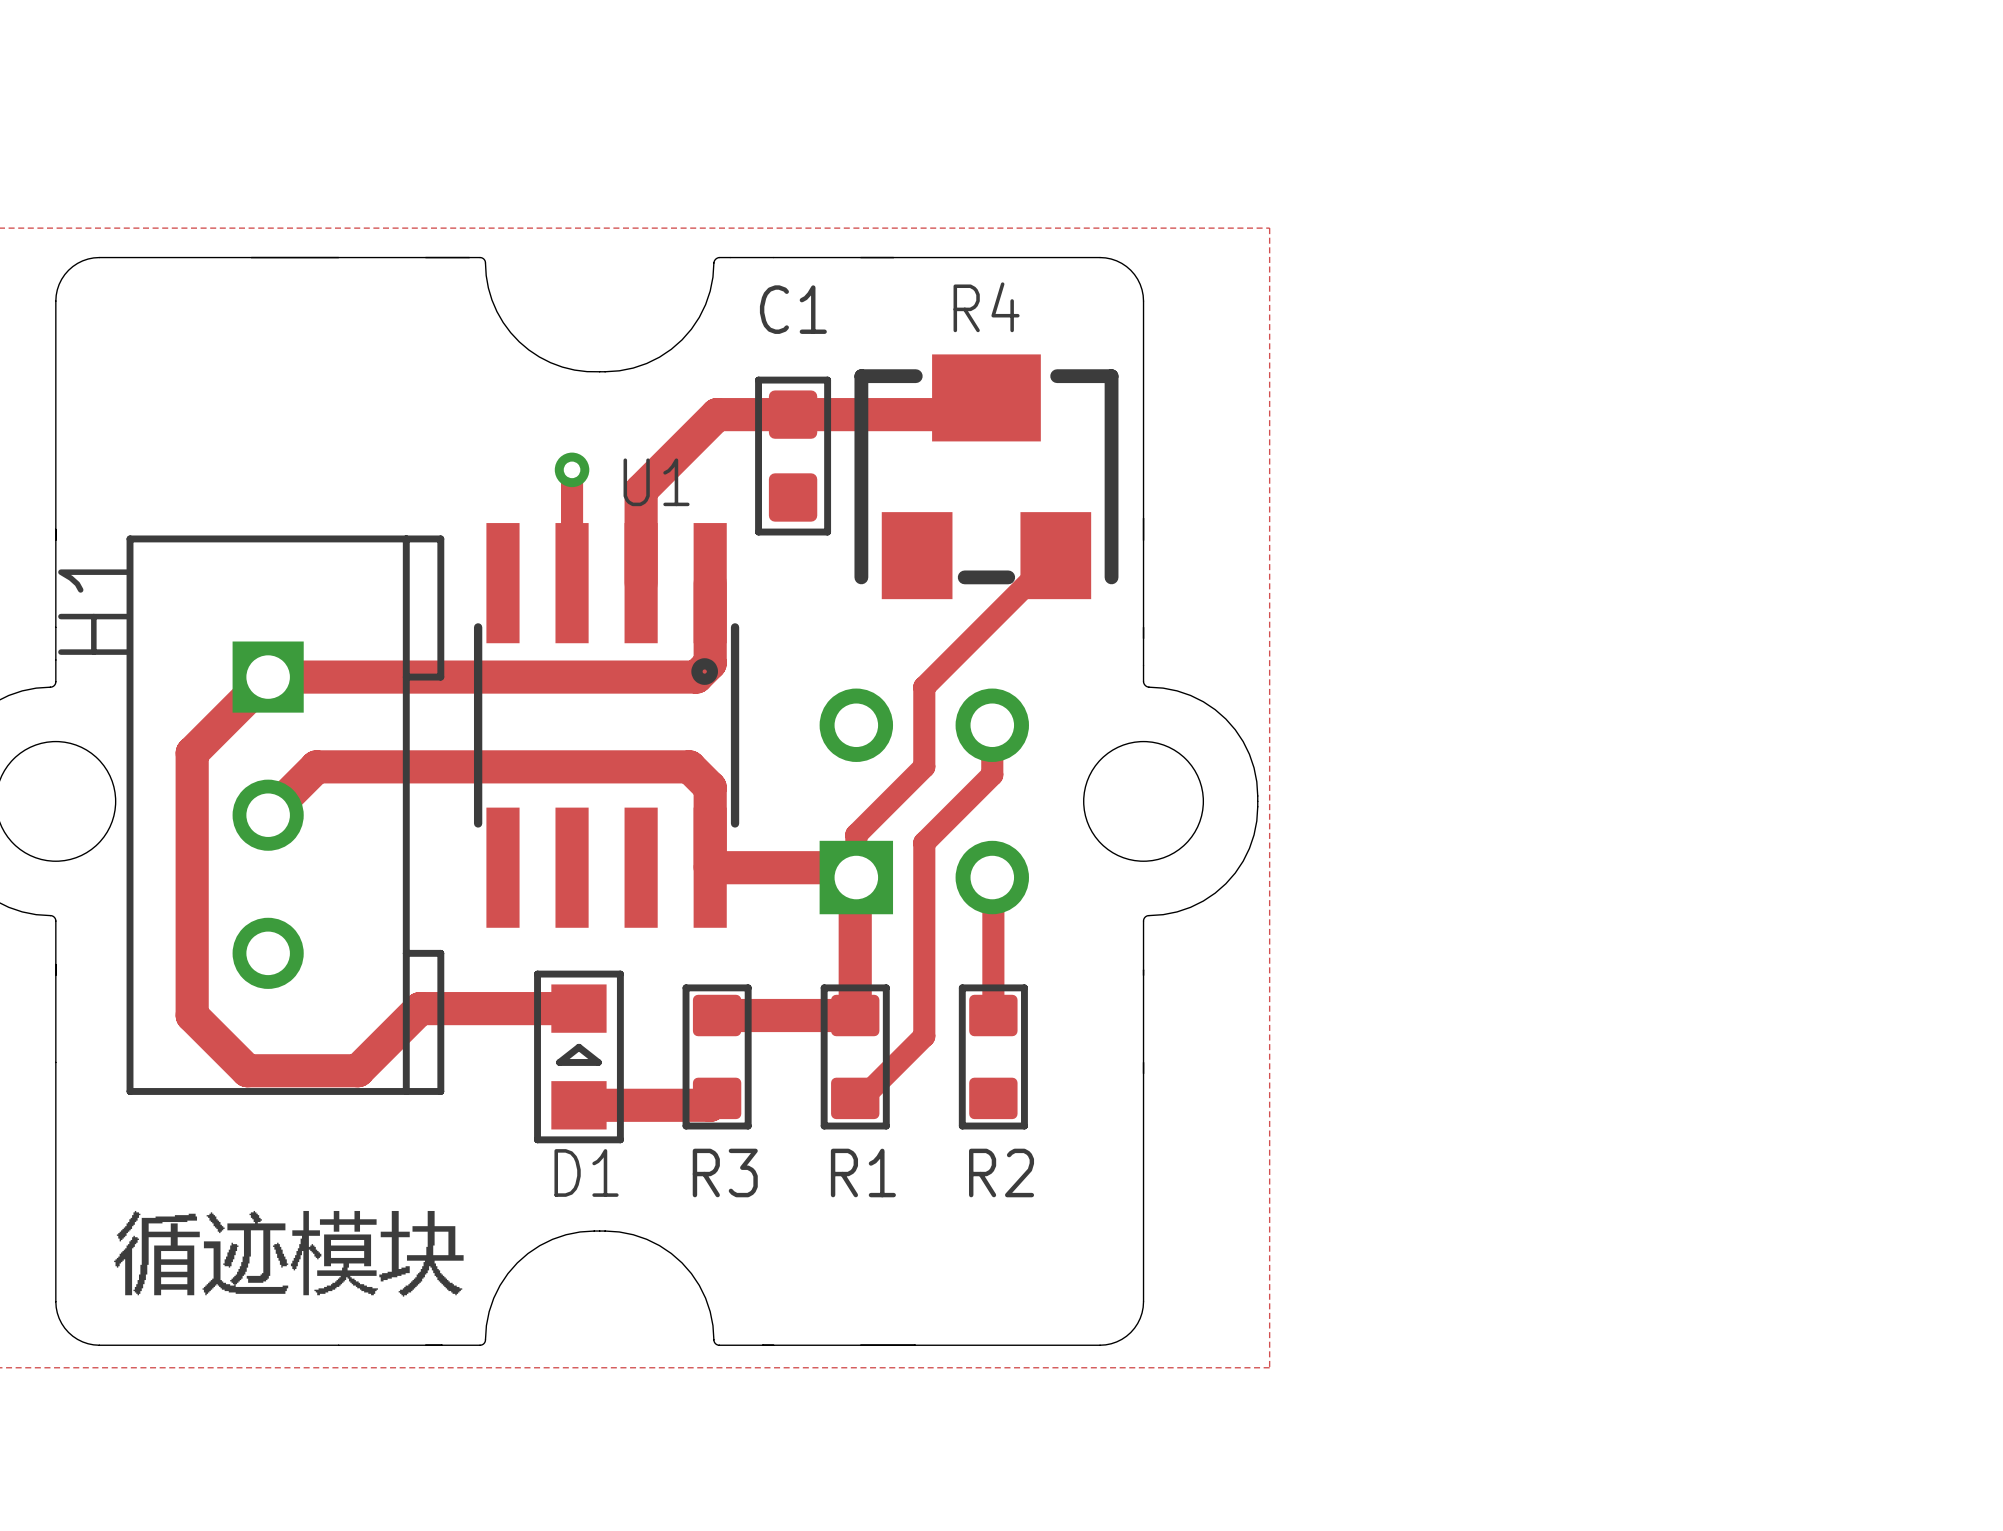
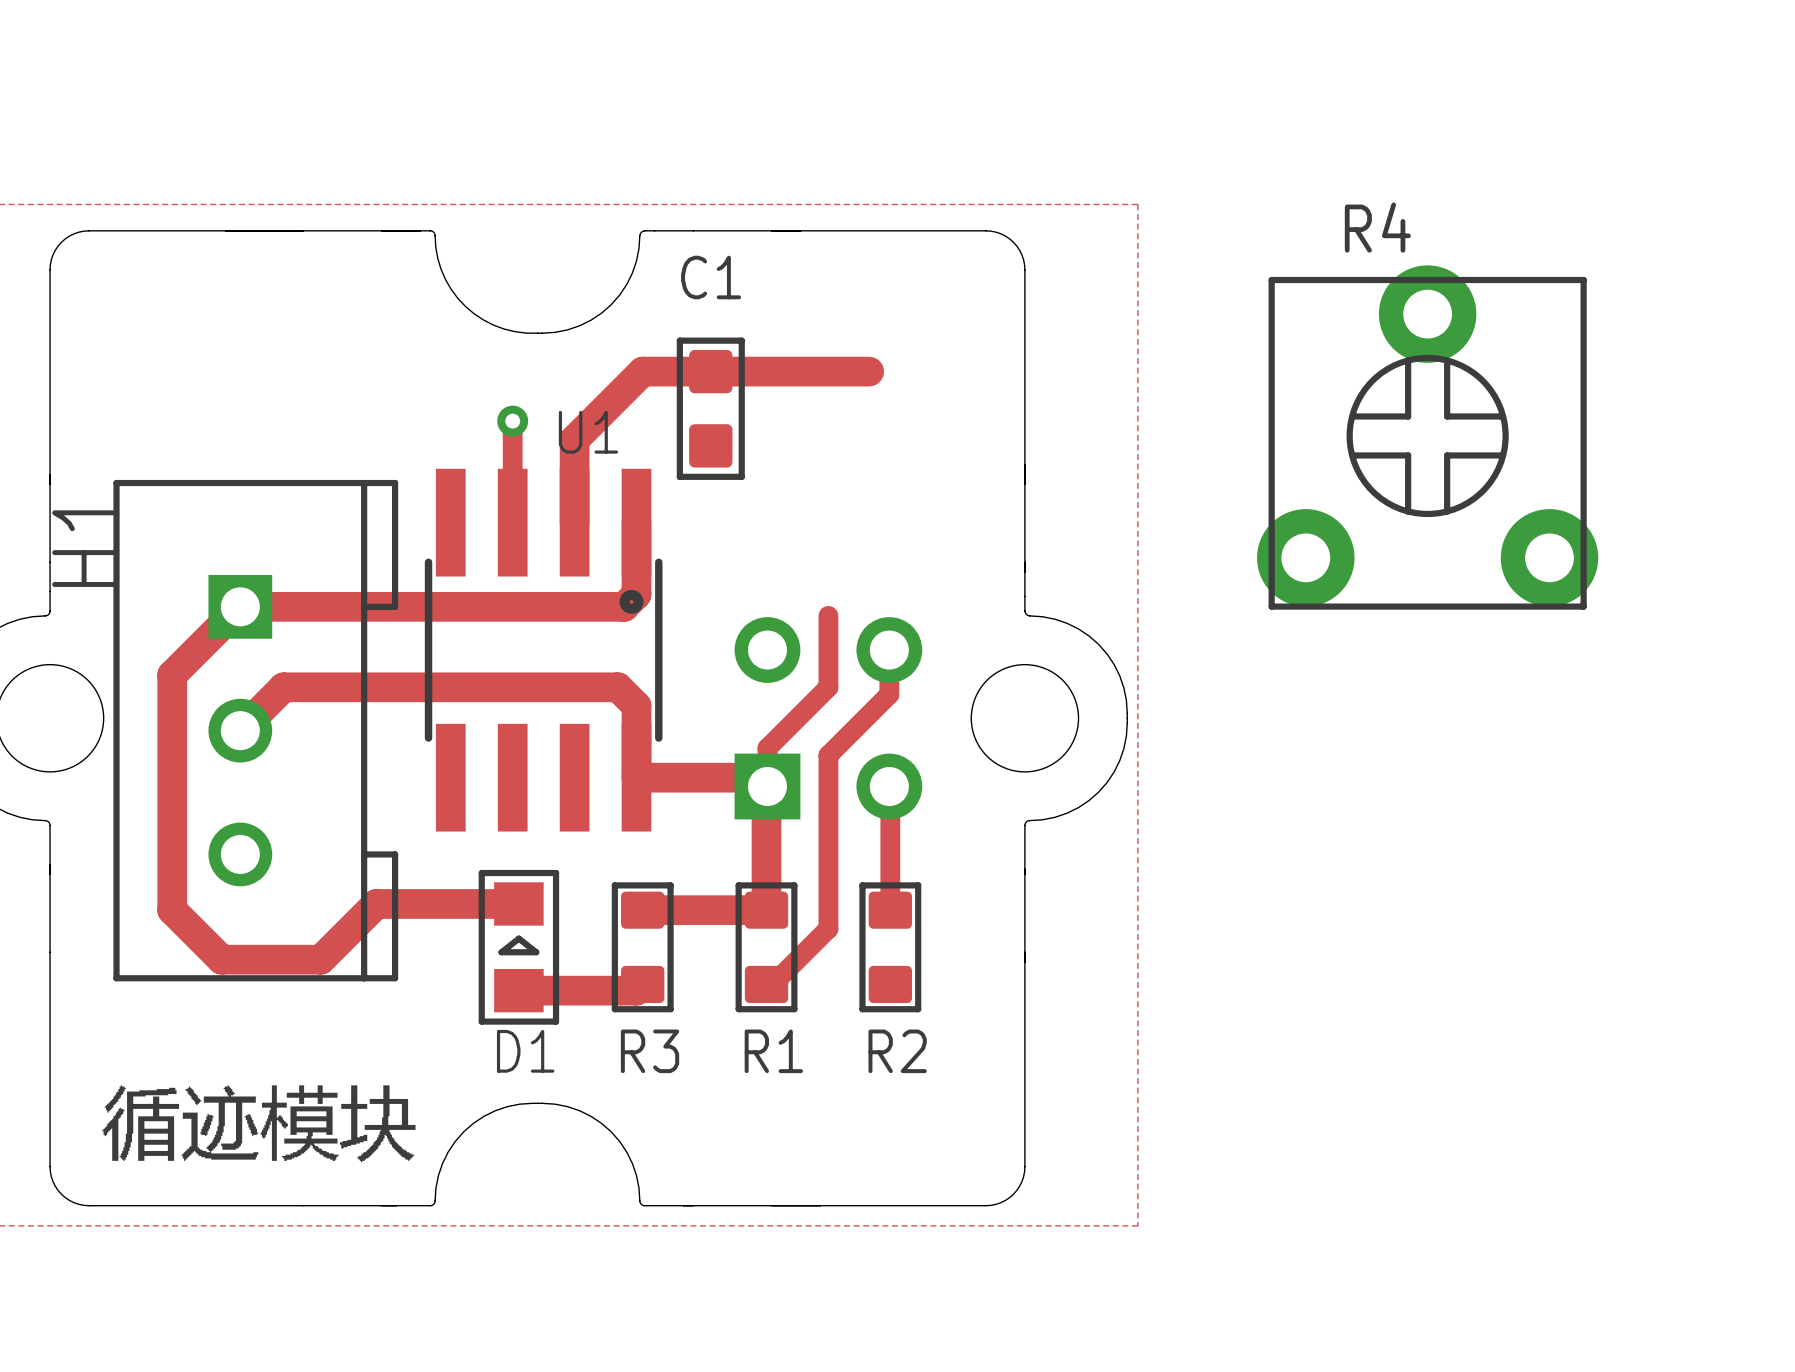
R4 footprint: [854, 354, 1119, 600] -> [1257, 265, 1599, 610]
track: (1055, 555) (924, 687) -> none

